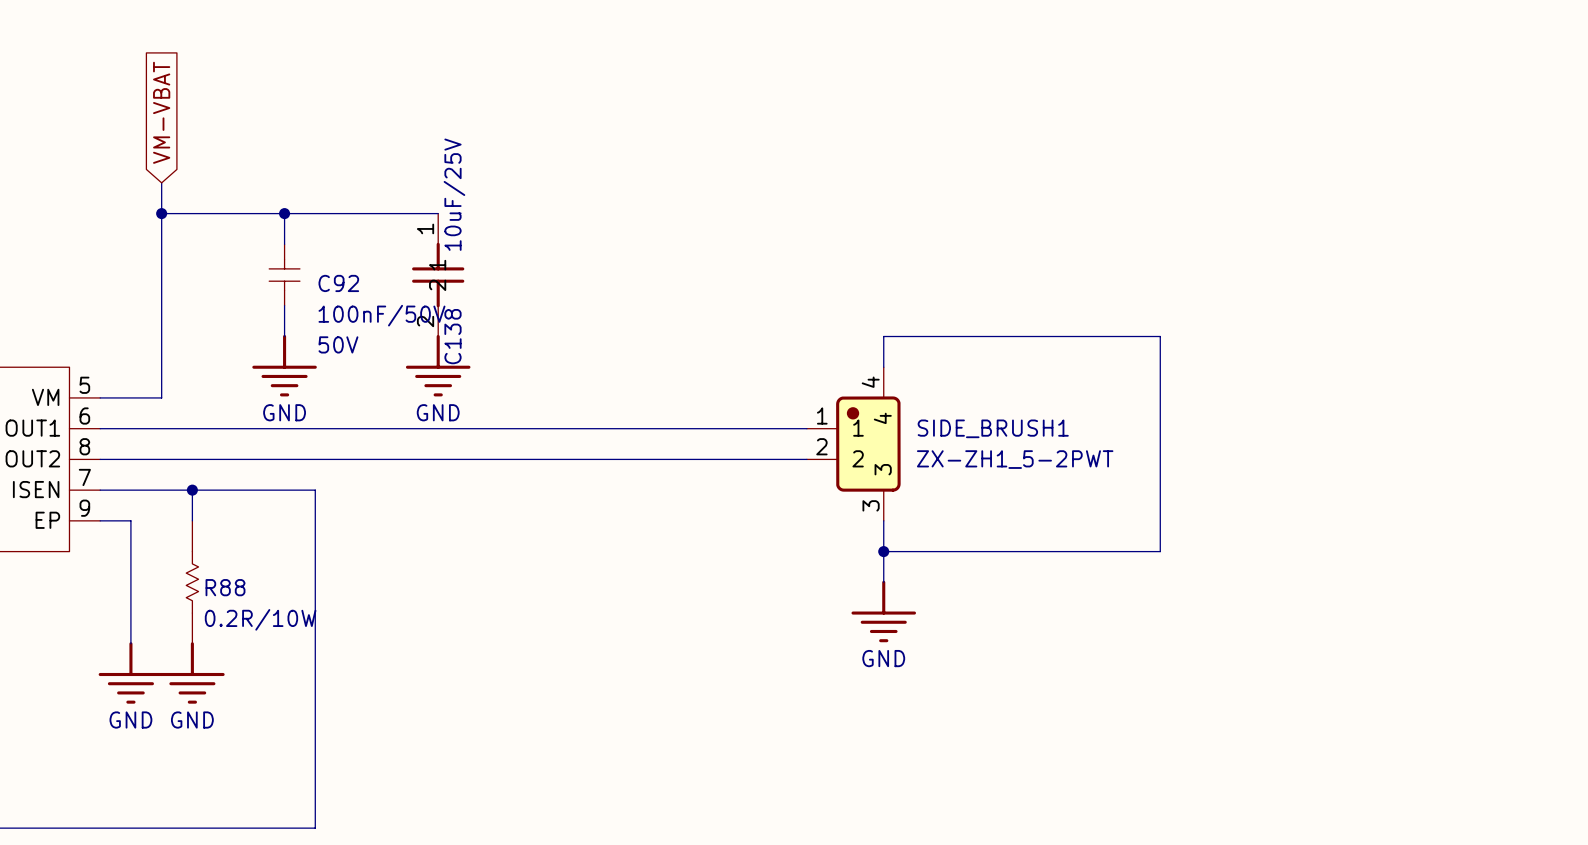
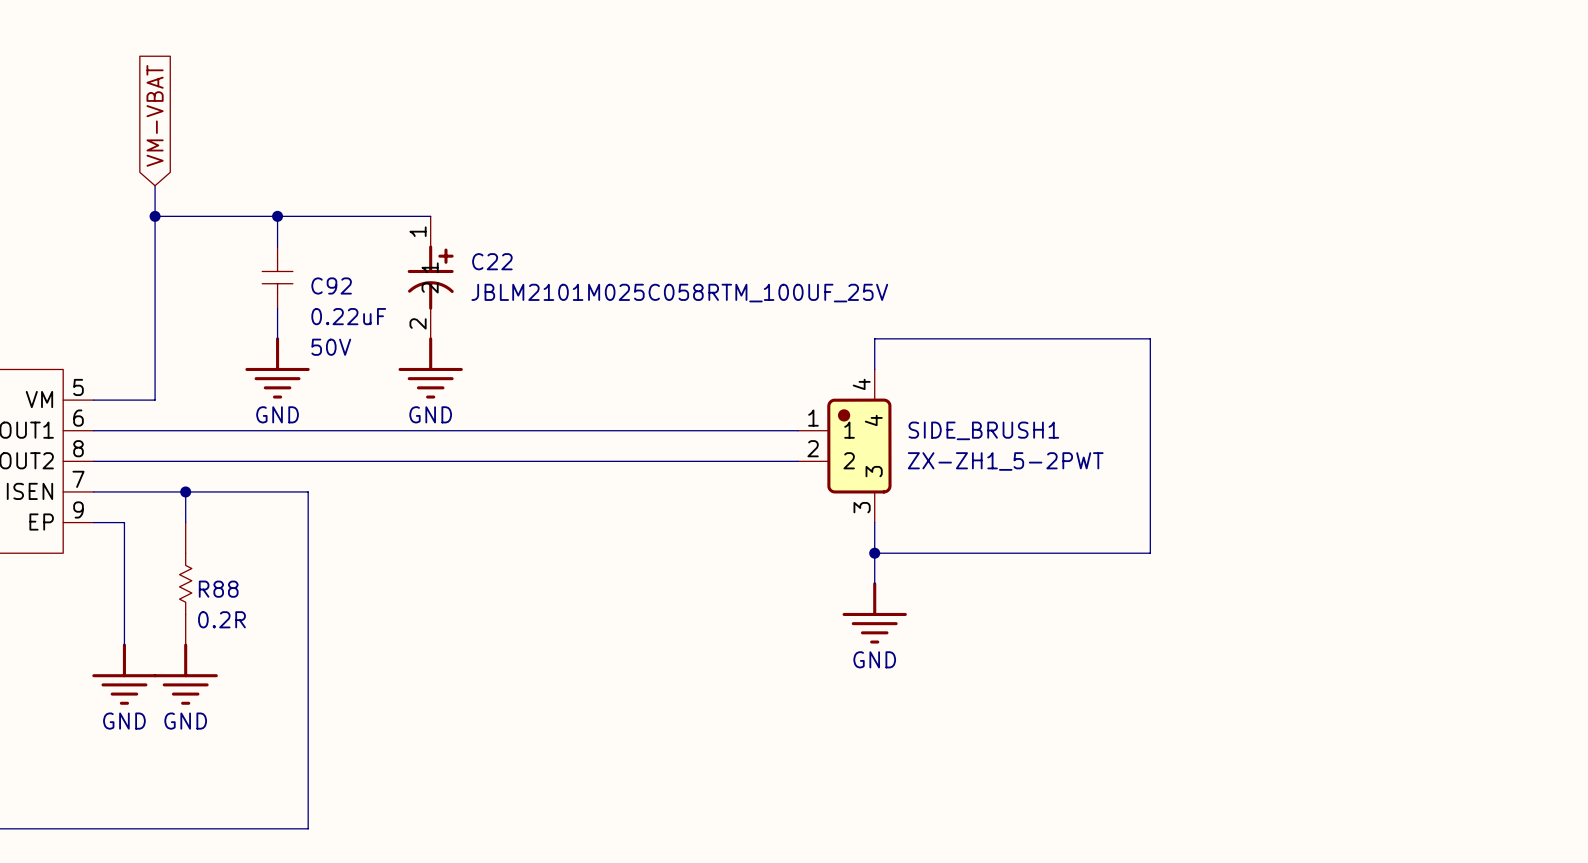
C138: 10uF/25V (438, 275) -> none
C22: none -> JBLM2101M025C058RTM_100UF_25V (430, 277)
C92 value: 100nF/50V (381, 315) -> 0.22uF (348, 316)
R88 value: 0.2R/10W (260, 619) -> 0.2R (221, 619)

